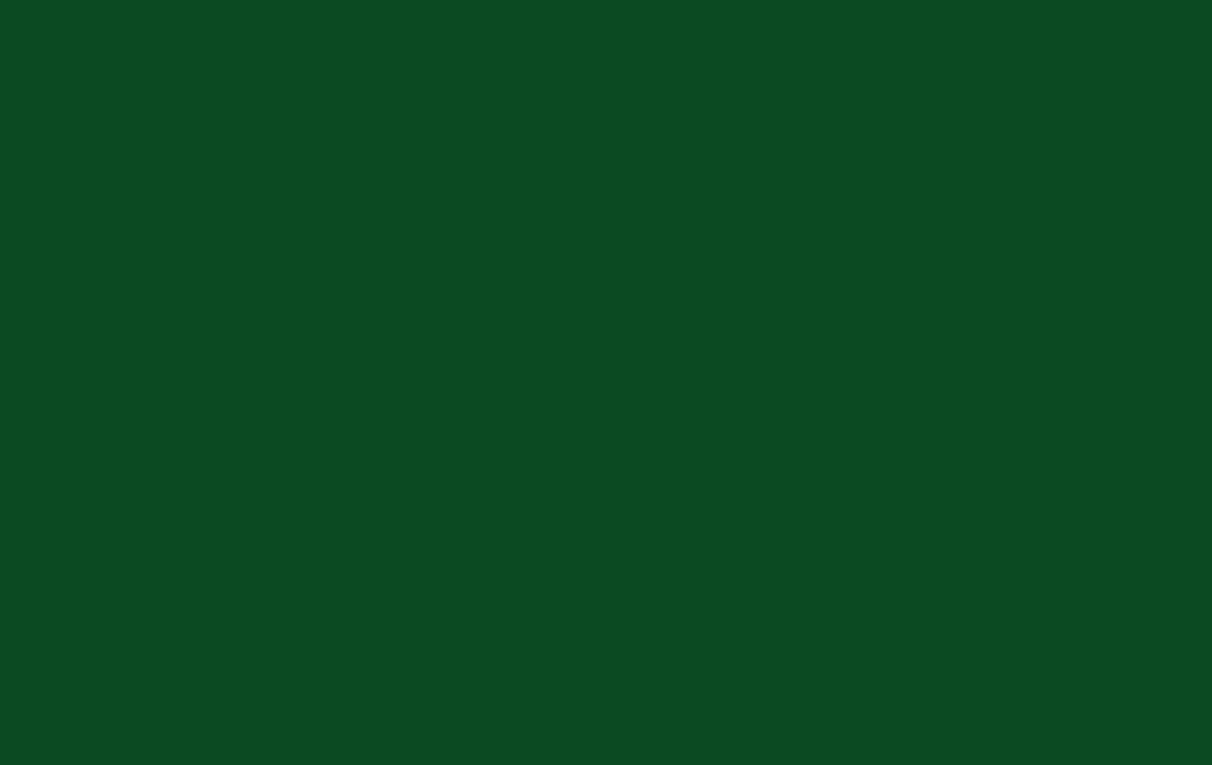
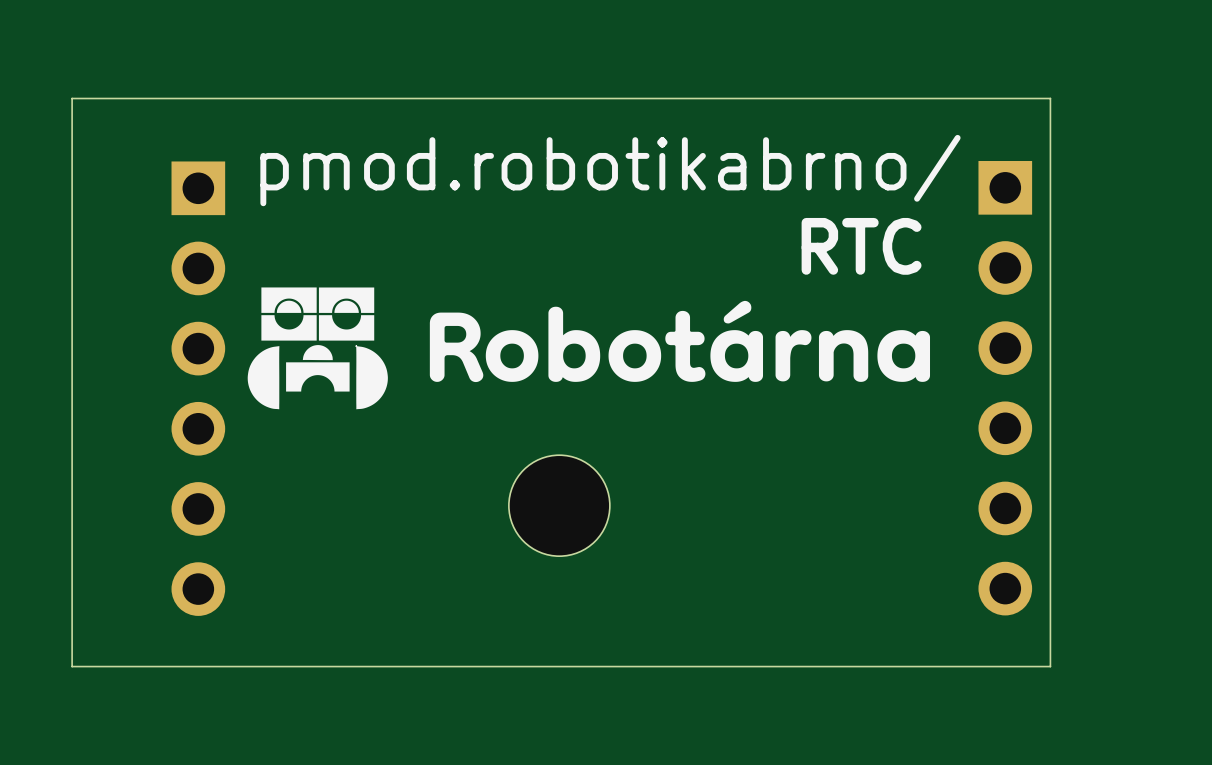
board edge: none -> (1050, 98) (1050, 666) (72, 666) (72, 98) (1050, 98)
text: none -> pmod.robotikabrno/ (610, 170)
text: none -> RTC (861, 246)
drawing: none -> [247, 287, 388, 410]
drawing: none -> [429, 300, 931, 383]
part: none -> (198, 388)
part: none -> (1005, 388)
part: none -> (559, 505)

